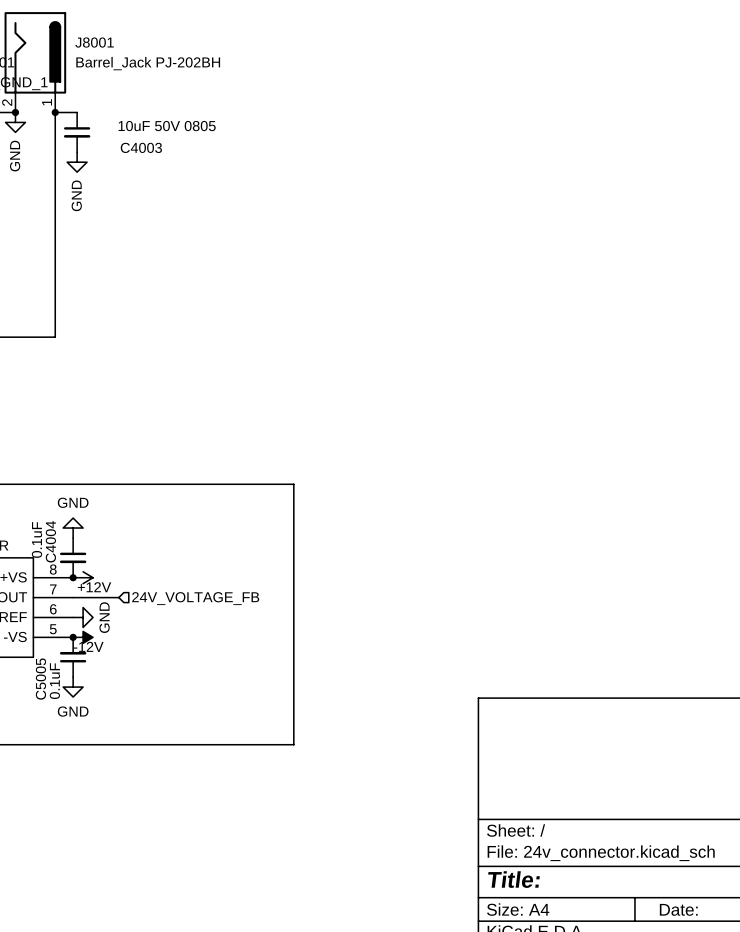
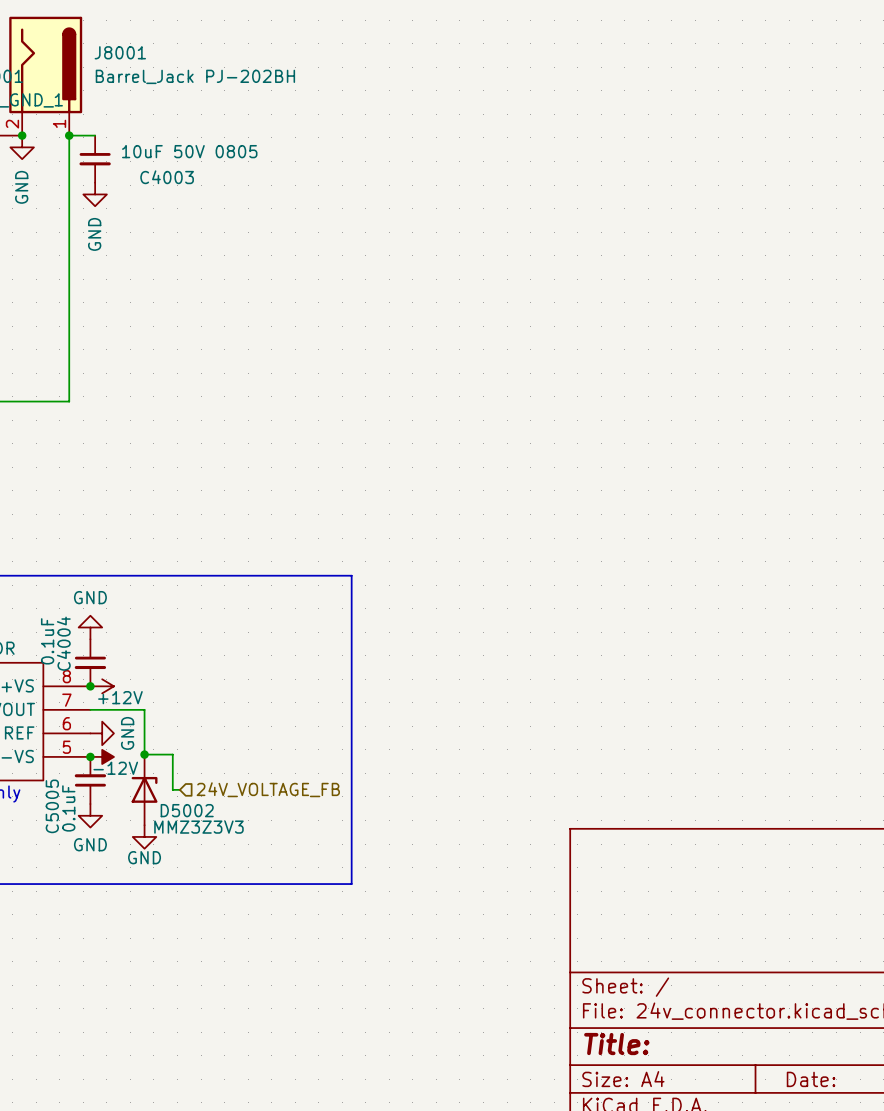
wire: none -> (144, 709) (144, 754) (172, 754) (172, 789) (179, 789)
hierarchical label position: 24V_VOLTAGE_FB (195, 598) -> 24V_VOLTAGE_FB (268, 789)
junction: none -> (144, 754)
D5002: none -> MMZ3Z3V3 (144, 789)
power symbol: none -> GND (144, 836)

